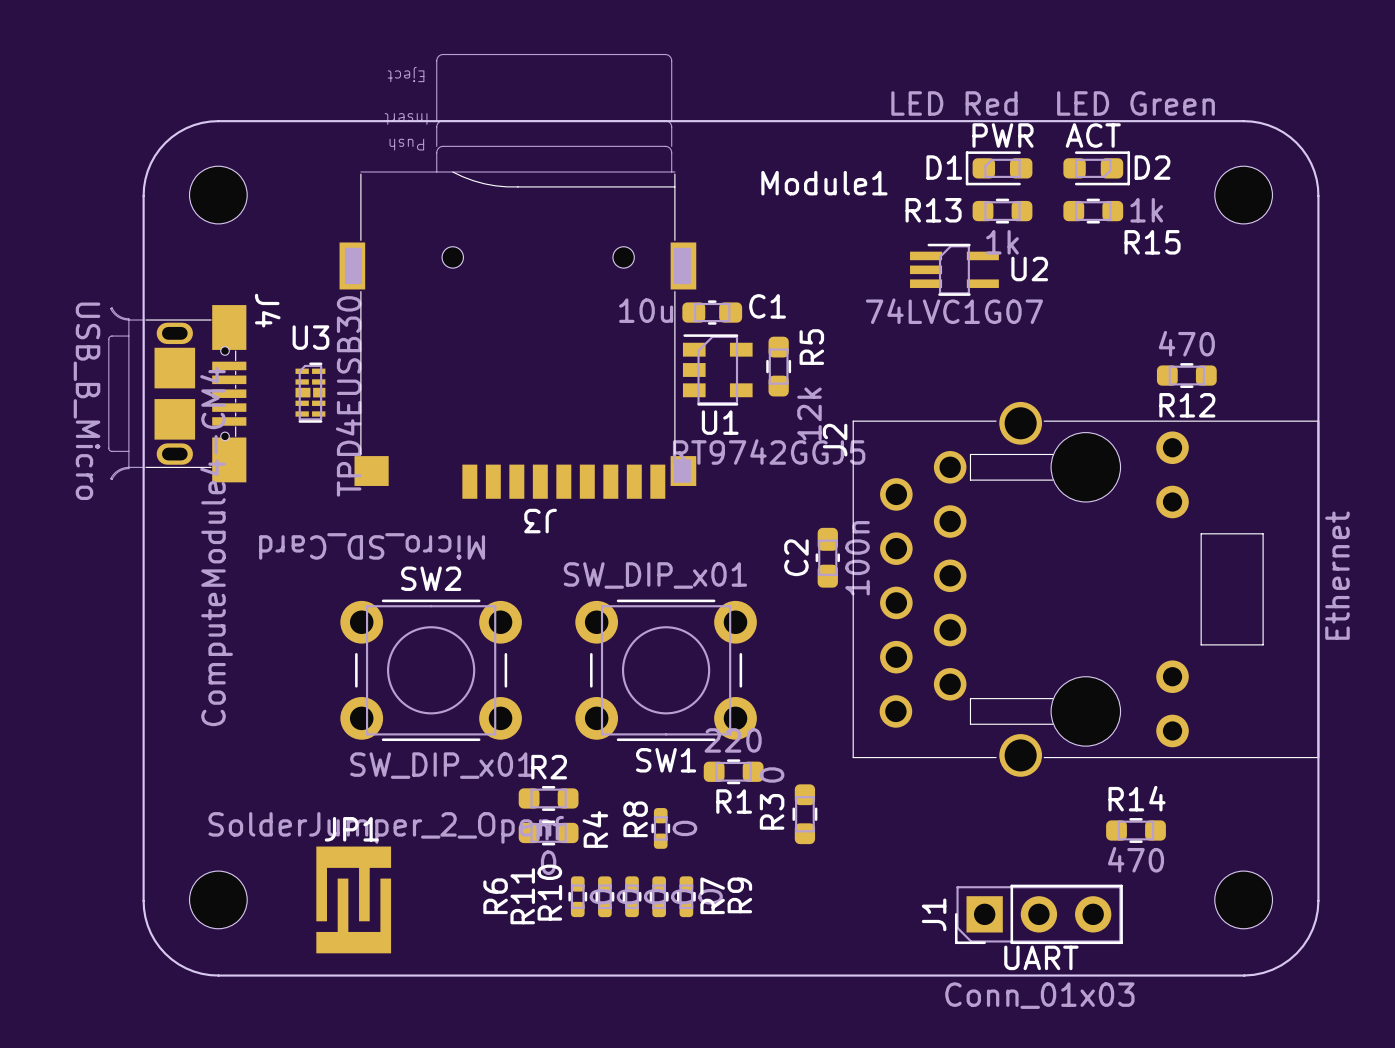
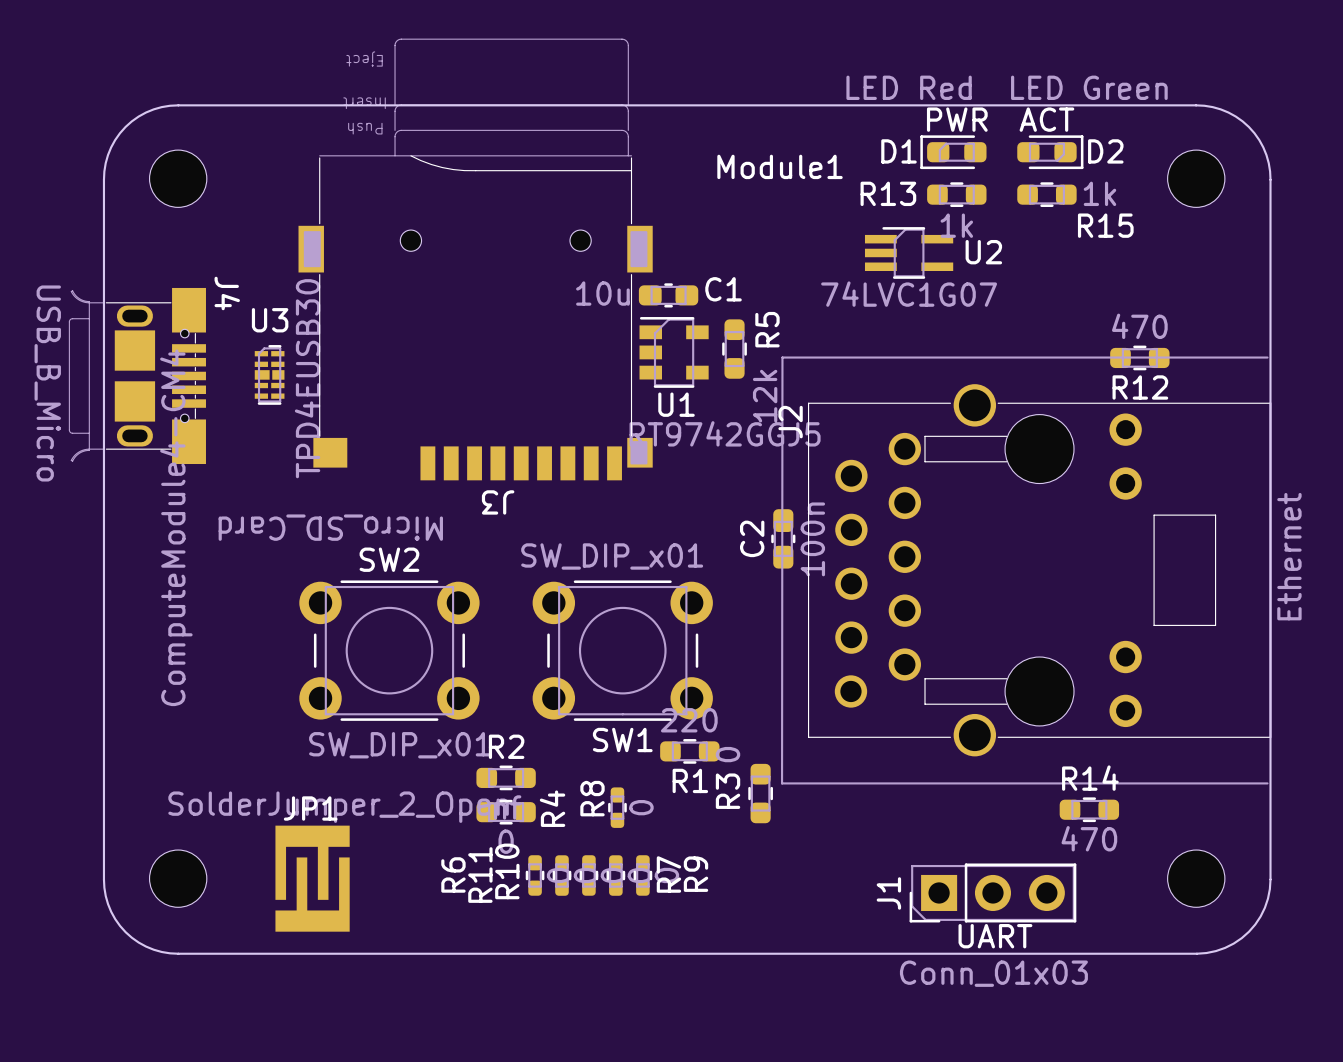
J2 footprint: [852, 401, 1320, 777] -> [780, 356, 1272, 785]

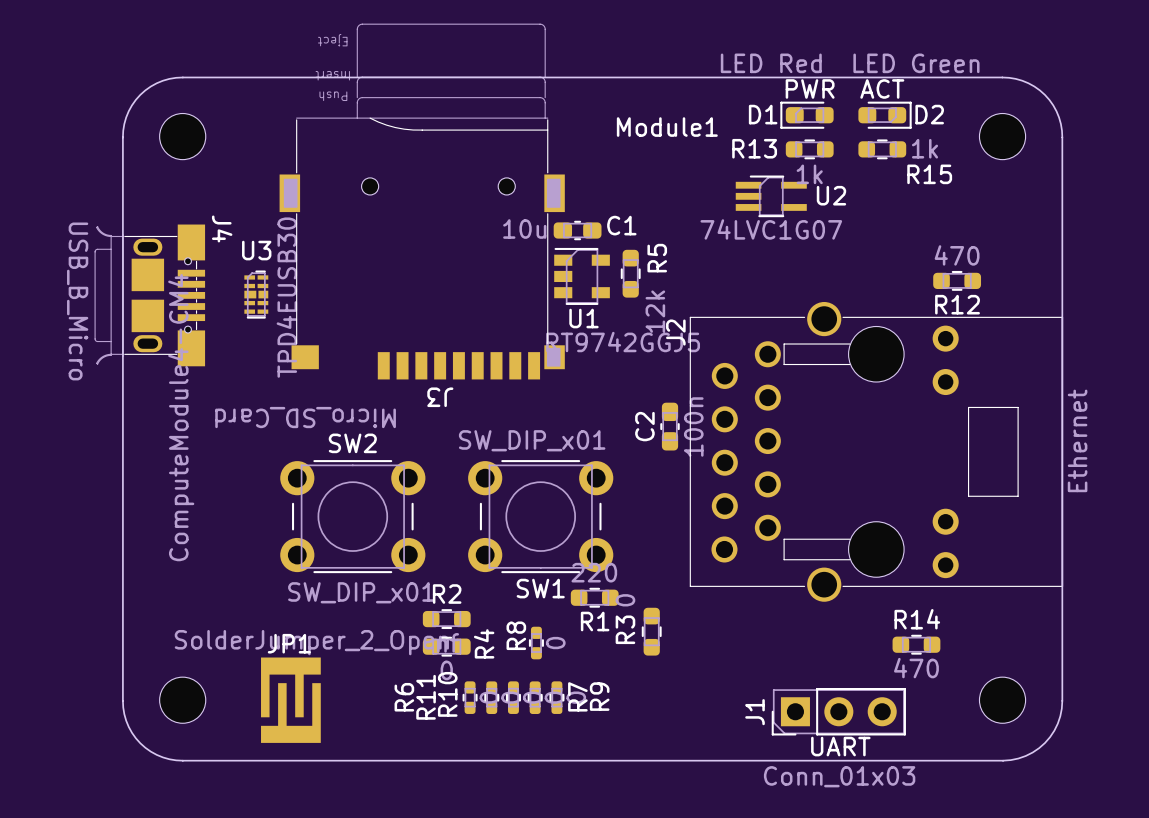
J2 footprint: [780, 356, 1272, 785] -> [689, 301, 1064, 602]

